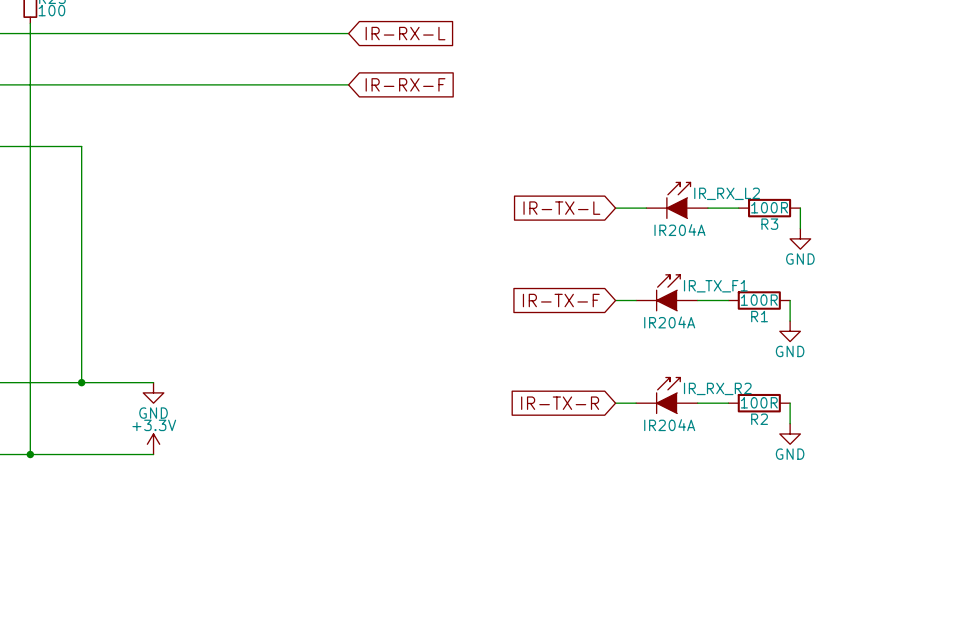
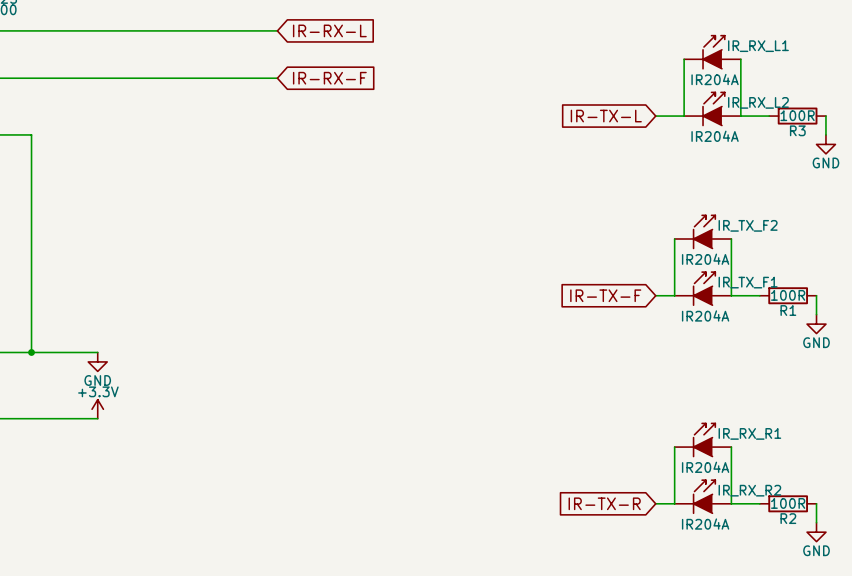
IR_RX_L1: none -> IR204A (712, 52)
wire: none -> (684, 59) (684, 116) (655, 116)
wire: none -> (740, 59) (740, 116) (769, 116)
power symbol: none -> GND (825, 144)
IR_RX_L2 position: (677, 200) -> (712, 109)
global label position: IR-TX-L (561, 208) -> IR-TX-L (606, 116)
wire: (615, 208) (646, 208) -> none
wire: (707, 208) (738, 208) -> none
R3 position: (769, 208) -> (797, 116)
wire: (800, 208) (800, 228) -> (825, 116) (825, 134)
power symbol: GND (800, 238) -> none
IR_TX_F2: none -> IR204A (703, 232)
wire: none -> (674, 238) (674, 295) (655, 295)
wire: none -> (731, 238) (731, 295) (759, 295)
IR_TX_F1 position: (666, 293) -> (703, 288)
global label position: IR-TX-F (561, 300) -> IR-TX-F (605, 295)
wire: (615, 300) (636, 300) -> none
wire: (697, 300) (728, 300) -> none
R1 position: (759, 300) -> (788, 295)
wire: (790, 300) (790, 321) -> none
power symbol: GND (790, 331) -> none
power symbol: none -> GND (816, 324)
IR_RX_R2 position: (666, 395) -> (703, 497)
global label: IR-TX-R (560, 403) -> none
wire: (615, 403) (636, 403) -> none
wire: (697, 403) (728, 403) -> none
R2 position: (759, 403) -> (788, 503)
wire: (790, 403) (790, 423) -> (816, 295) (816, 314)
power symbol: GND (790, 433) -> none
IR_RX_R1: none -> IR204A (703, 440)
wire: none -> (674, 447) (674, 503) (655, 503)
wire: none -> (731, 447) (731, 503) (759, 503)
global label: none -> IR-TX-R (604, 503)
wire: none -> (816, 503) (816, 522)
power symbol: none -> GND (816, 532)

